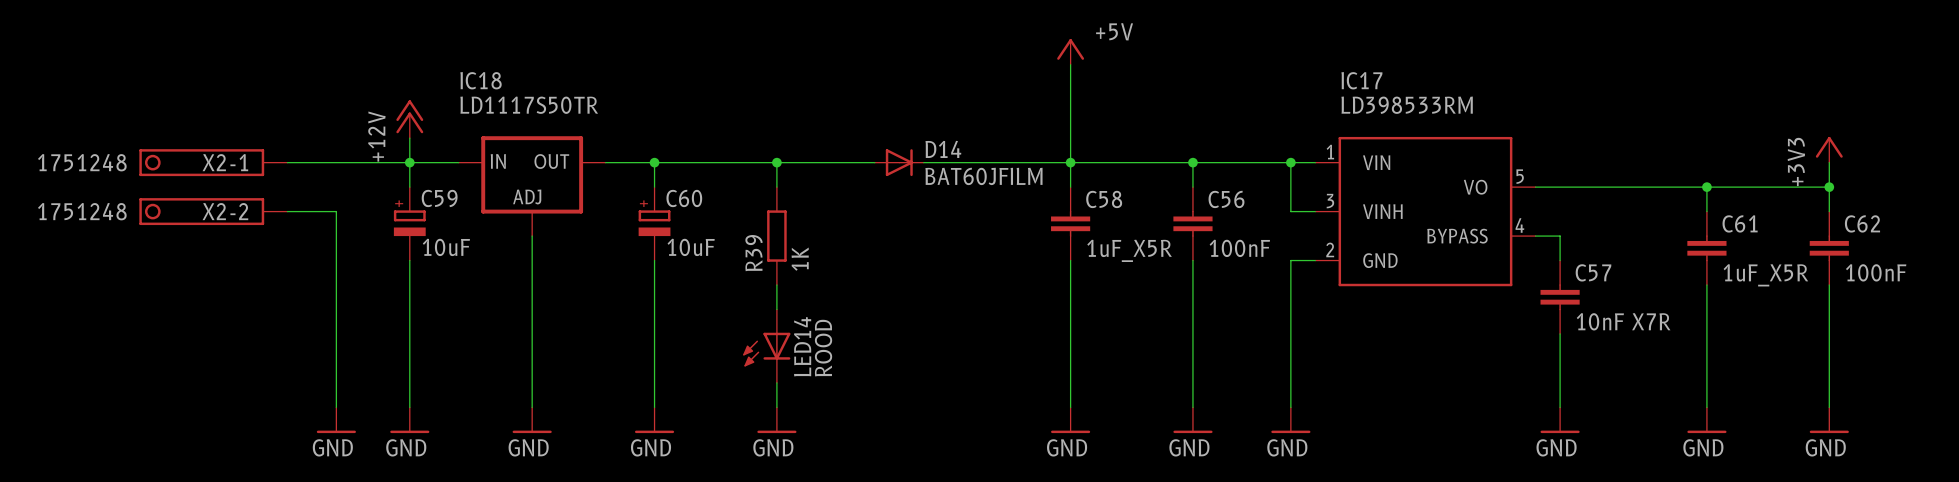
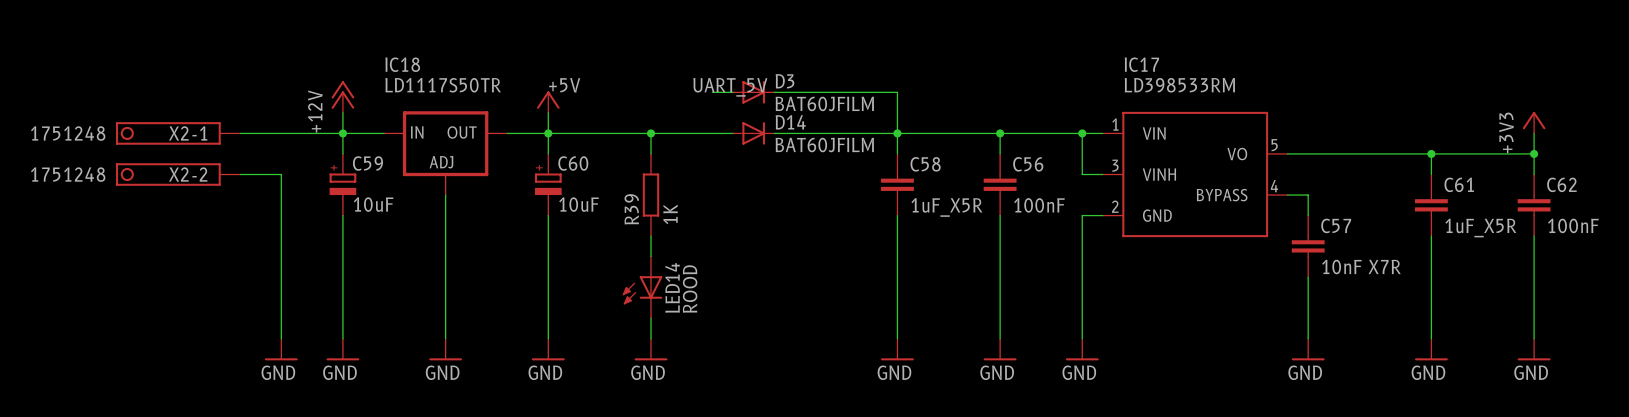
power symbol: +5V (1070, 51) -> none
wire: (1070, 64) (1070, 113) -> (774, 92) (897, 92)
label: none -> UART_5V (730, 87)
wire: none -> (712, 92) (733, 92)
D3: none -> BAT60JFILM (753, 92)
power symbol: none -> +5V (548, 102)
wire: none -> (548, 112) (548, 133)

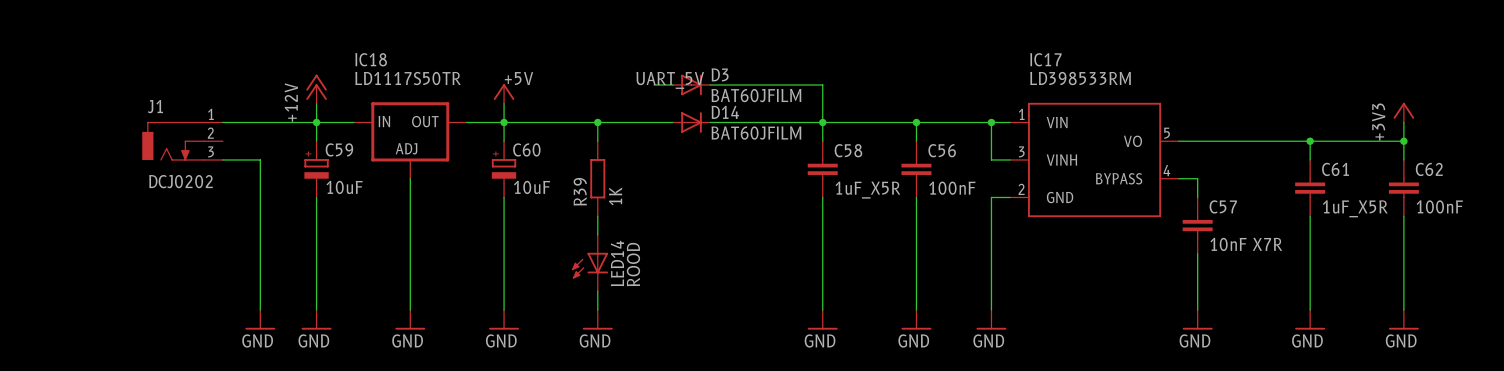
X2-1: 1751248 (178, 133) -> none
J1: none -> DCJ0202 (182, 141)
X2-2: 1751248 (178, 174) -> none

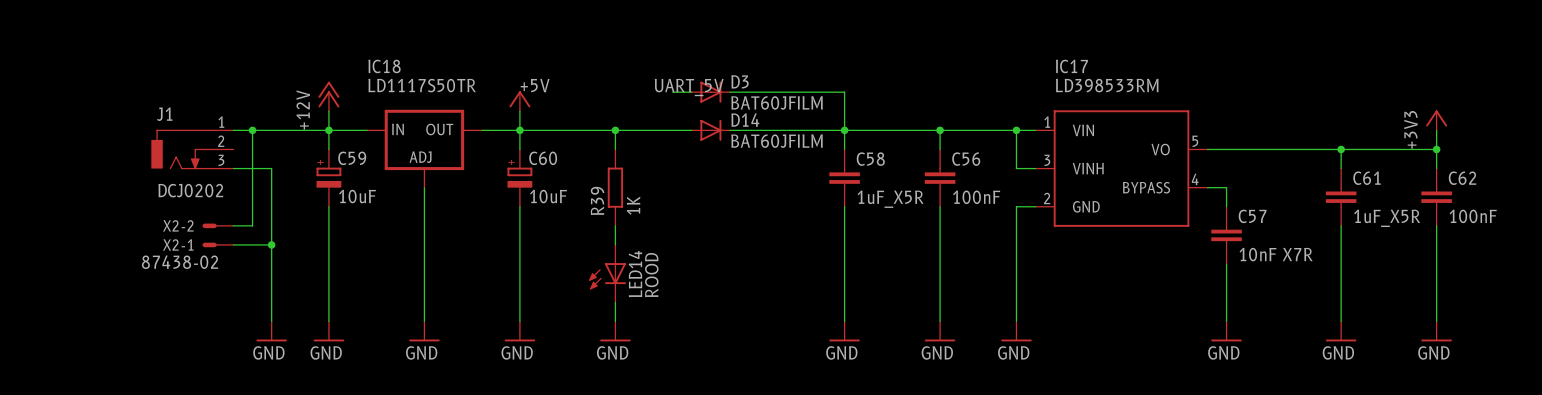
wire: none -> (252, 130) (252, 225) (233, 225)
junction: none -> (252, 130)
X2-2: none -> (217, 225)
X2-1: none -> 87438-02 (217, 244)
wire: none -> (233, 244) (271, 244)
junction: none -> (271, 244)

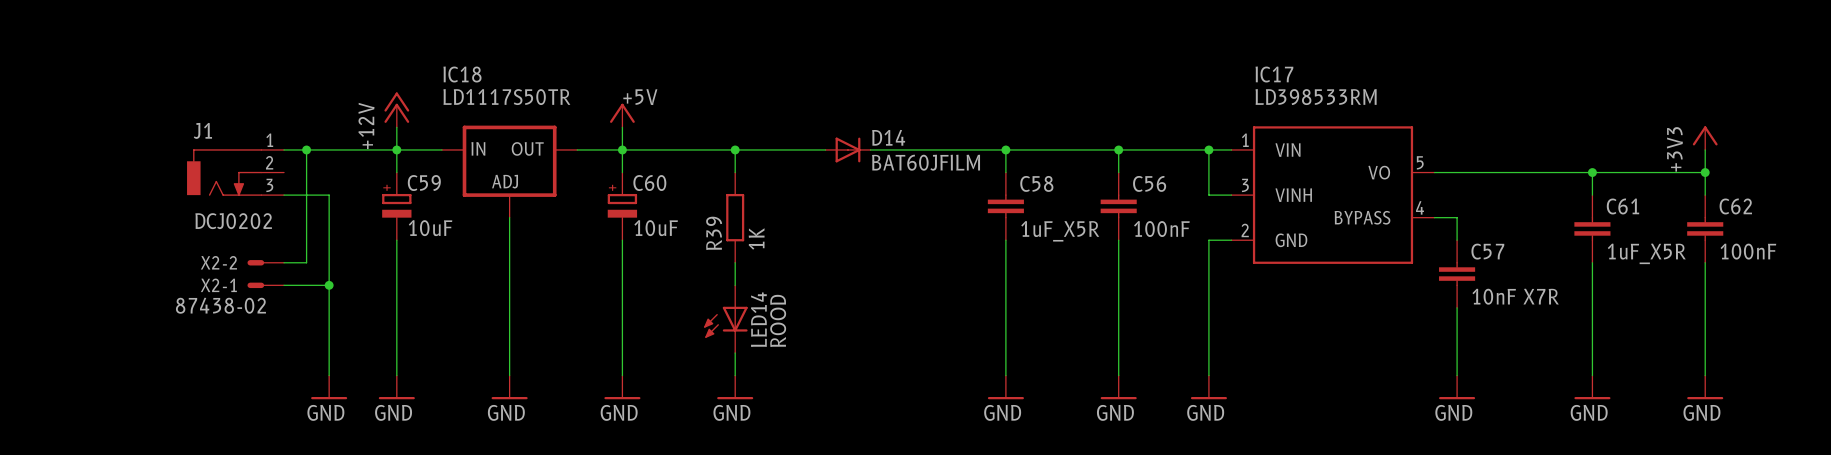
label: UART_5V (689, 87) -> none
wire: (672, 92) (691, 92) -> none
D3: BAT60JFILM (710, 92) -> none
wire: (730, 92) (844, 92) (844, 130) -> none

